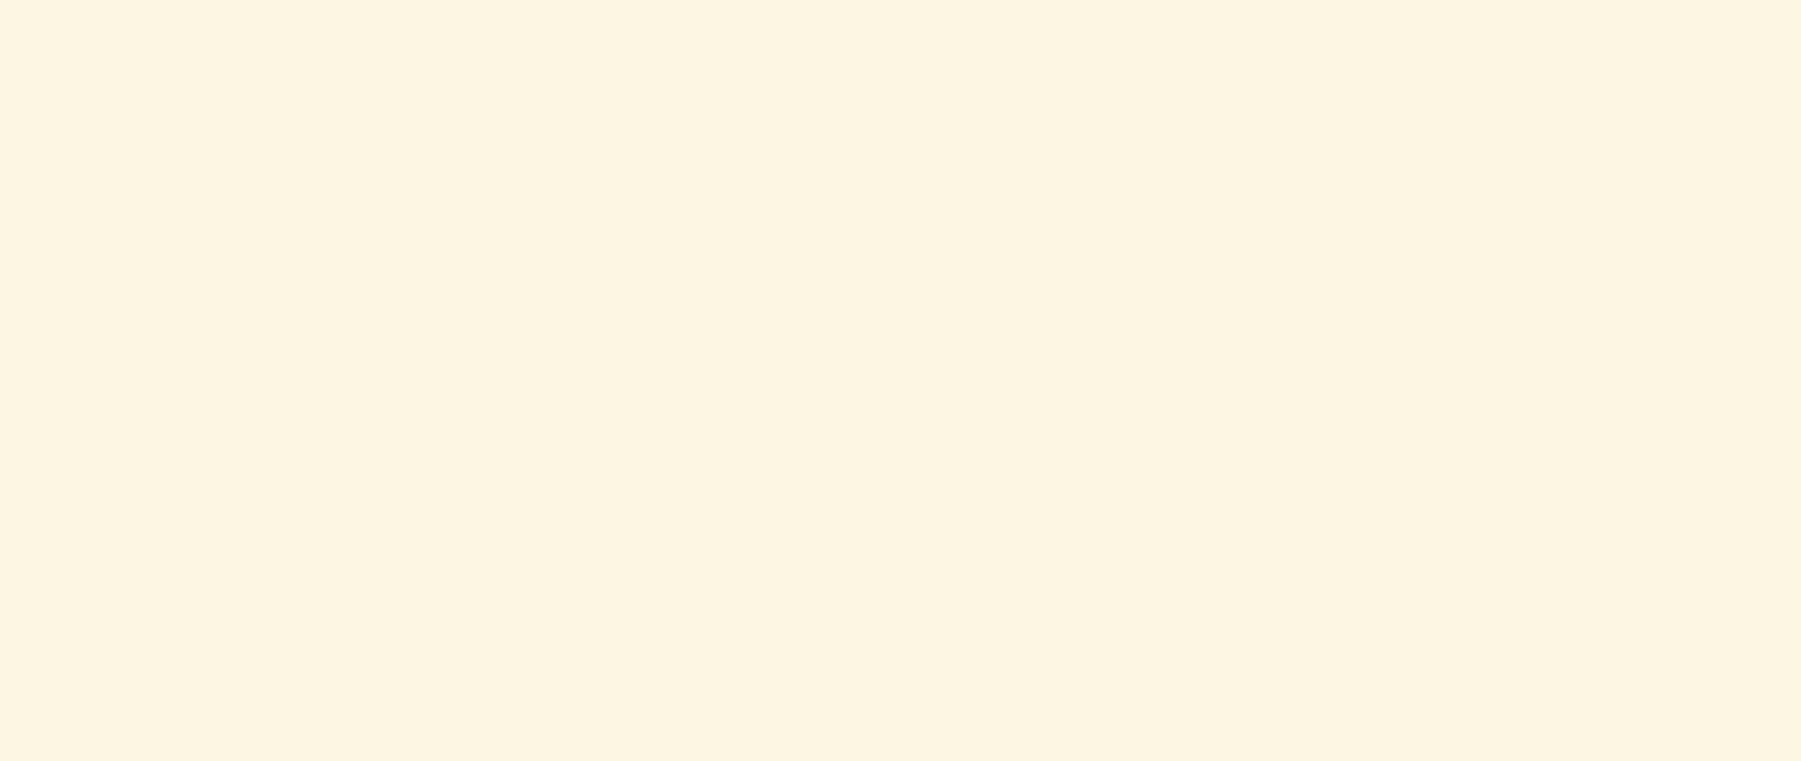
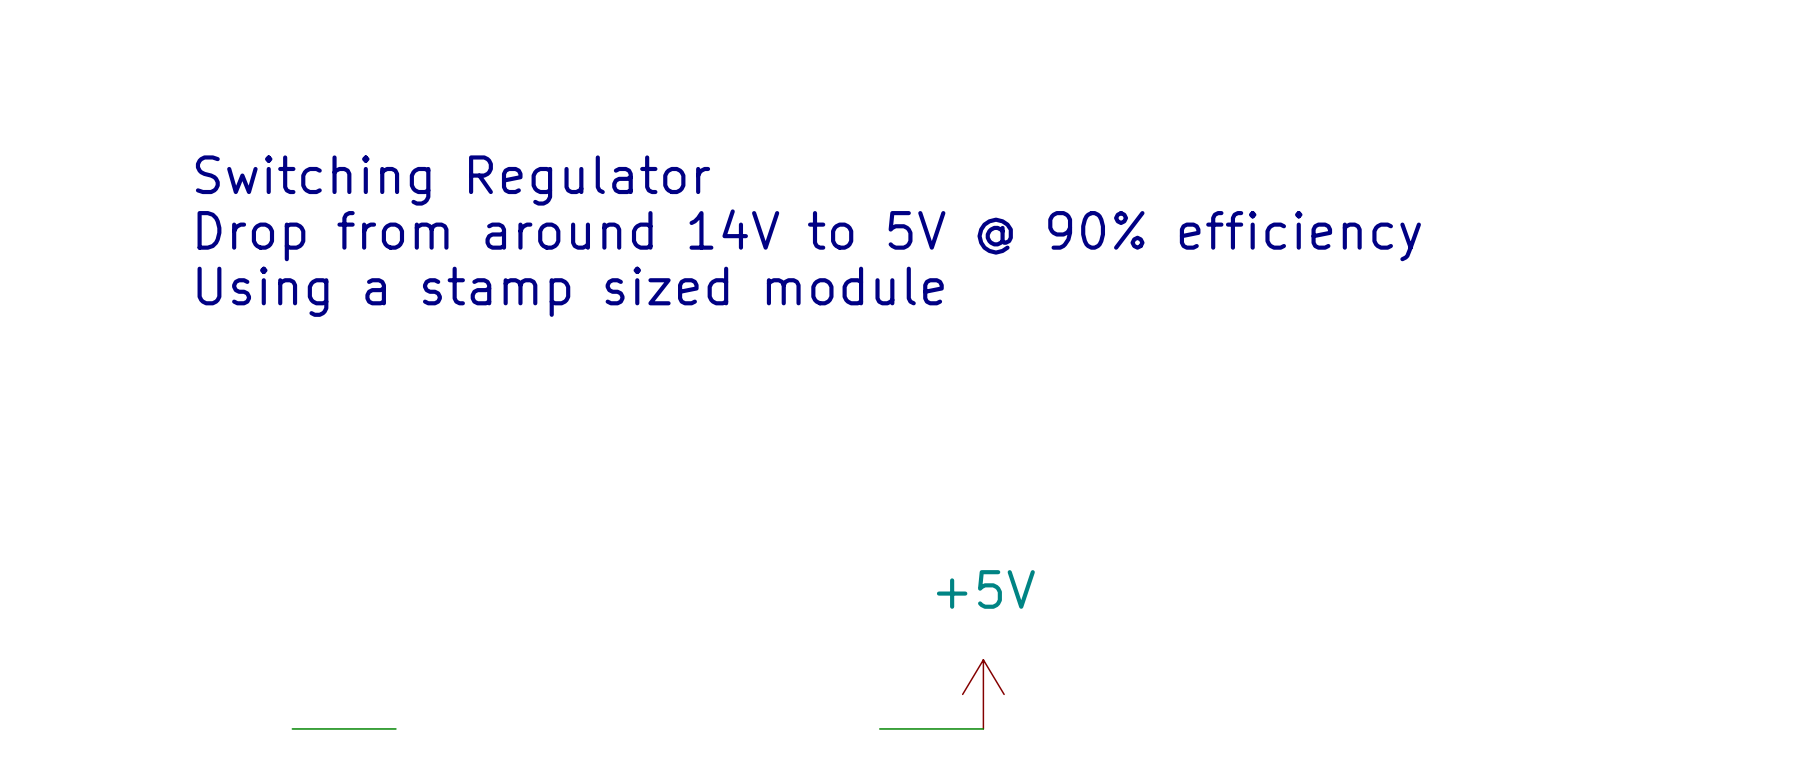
text: none -> Switching Regulator (453, 180)
text: none -> Drop from around 14V to 5V @ 90% efficiency (809, 235)
text: none -> Using a stamp sized module (570, 291)
power symbol: none -> +5V (983, 694)
wire: none -> (292, 728) (395, 728)
wire: none -> (879, 728) (983, 728)

